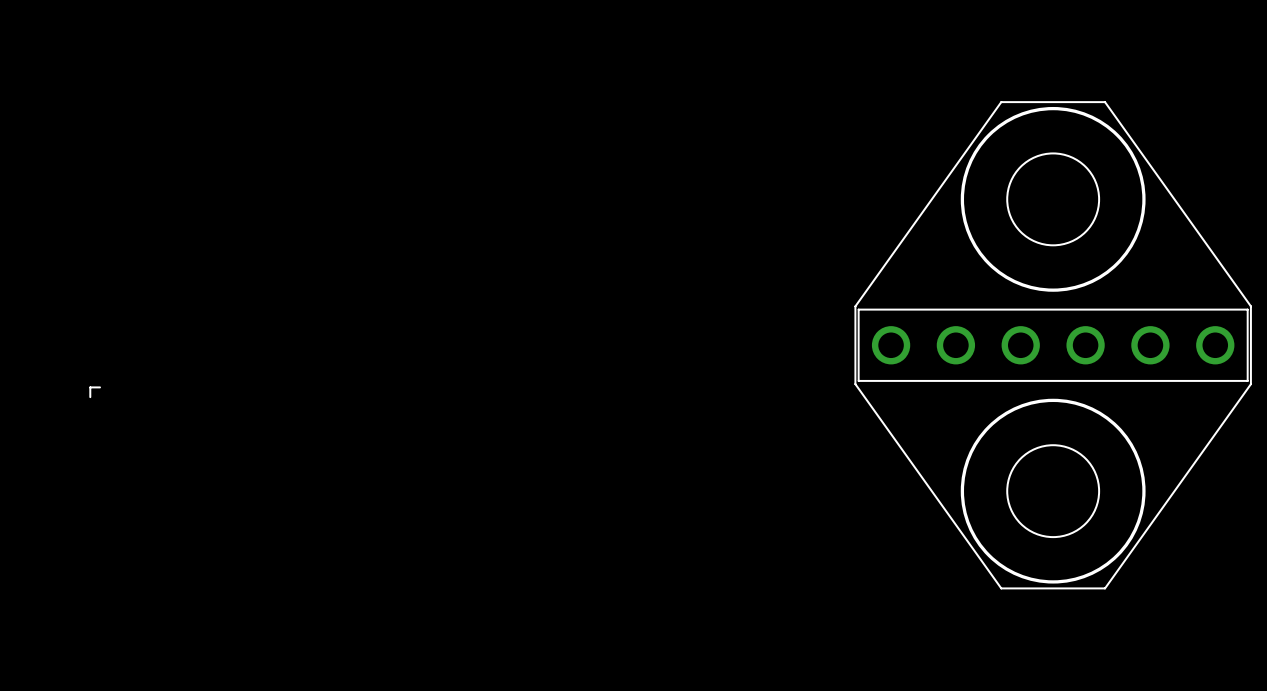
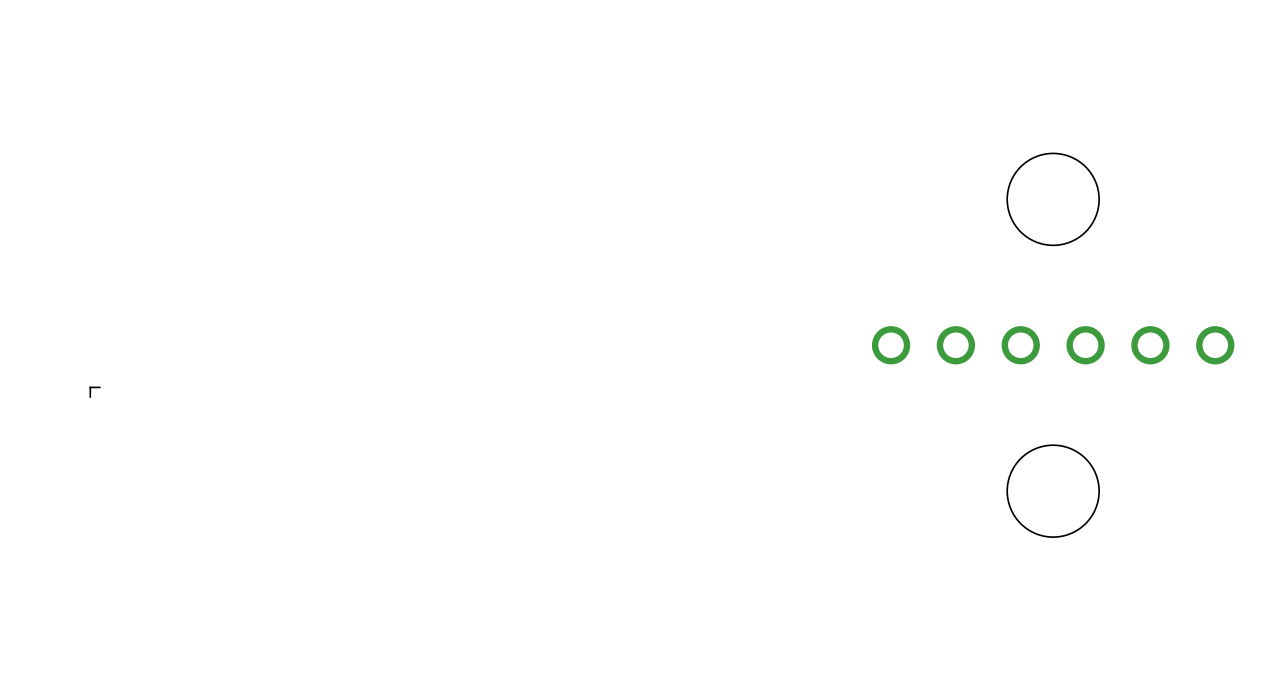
board edge: (1105, 102) (1250, 306) (1250, 384) (1105, 588) (1001, 588) (855, 384) (855, 306) (1001, 102) (1105, 102) -> none
round board edge: [960, 106, 1146, 292] -> none
board edge: (1247, 309) (1247, 380) (858, 380) (858, 309) (1247, 309) -> none
round board edge: [960, 398, 1146, 584] -> none

